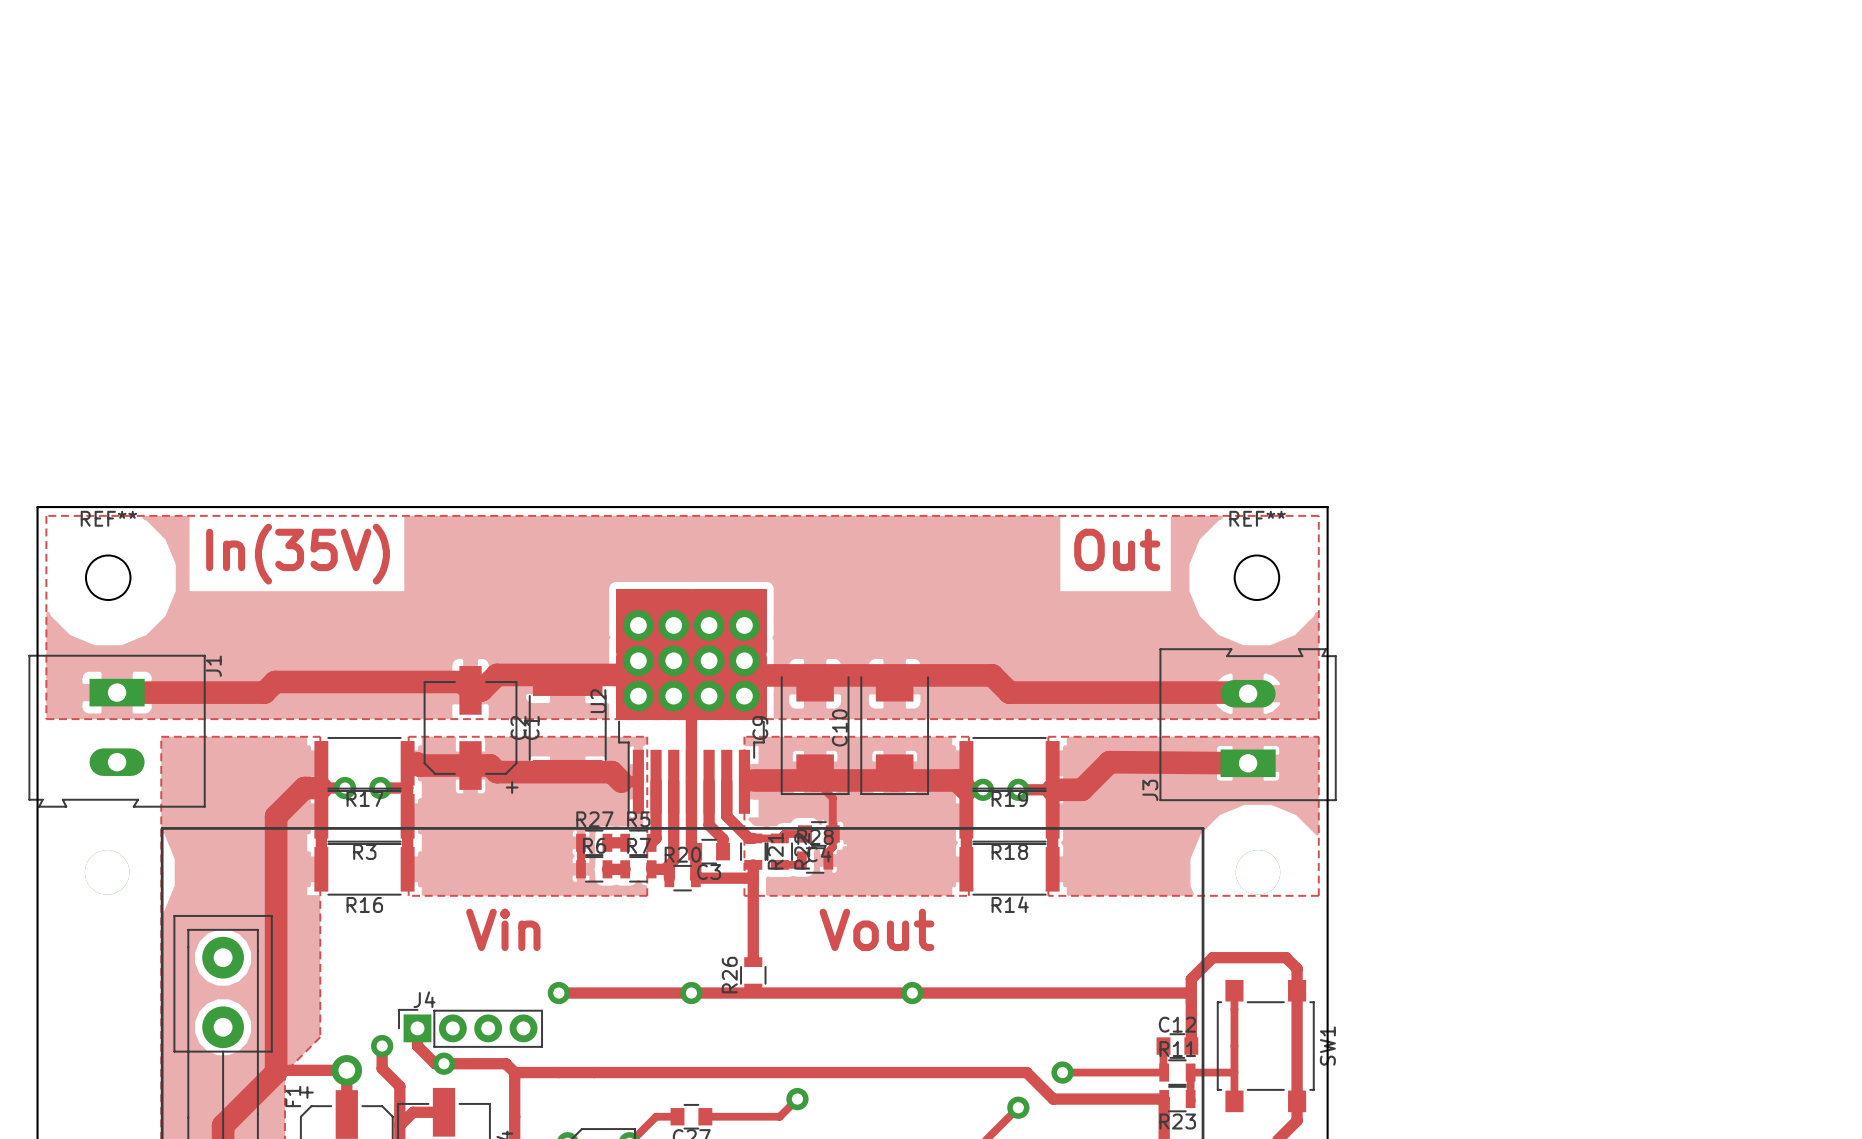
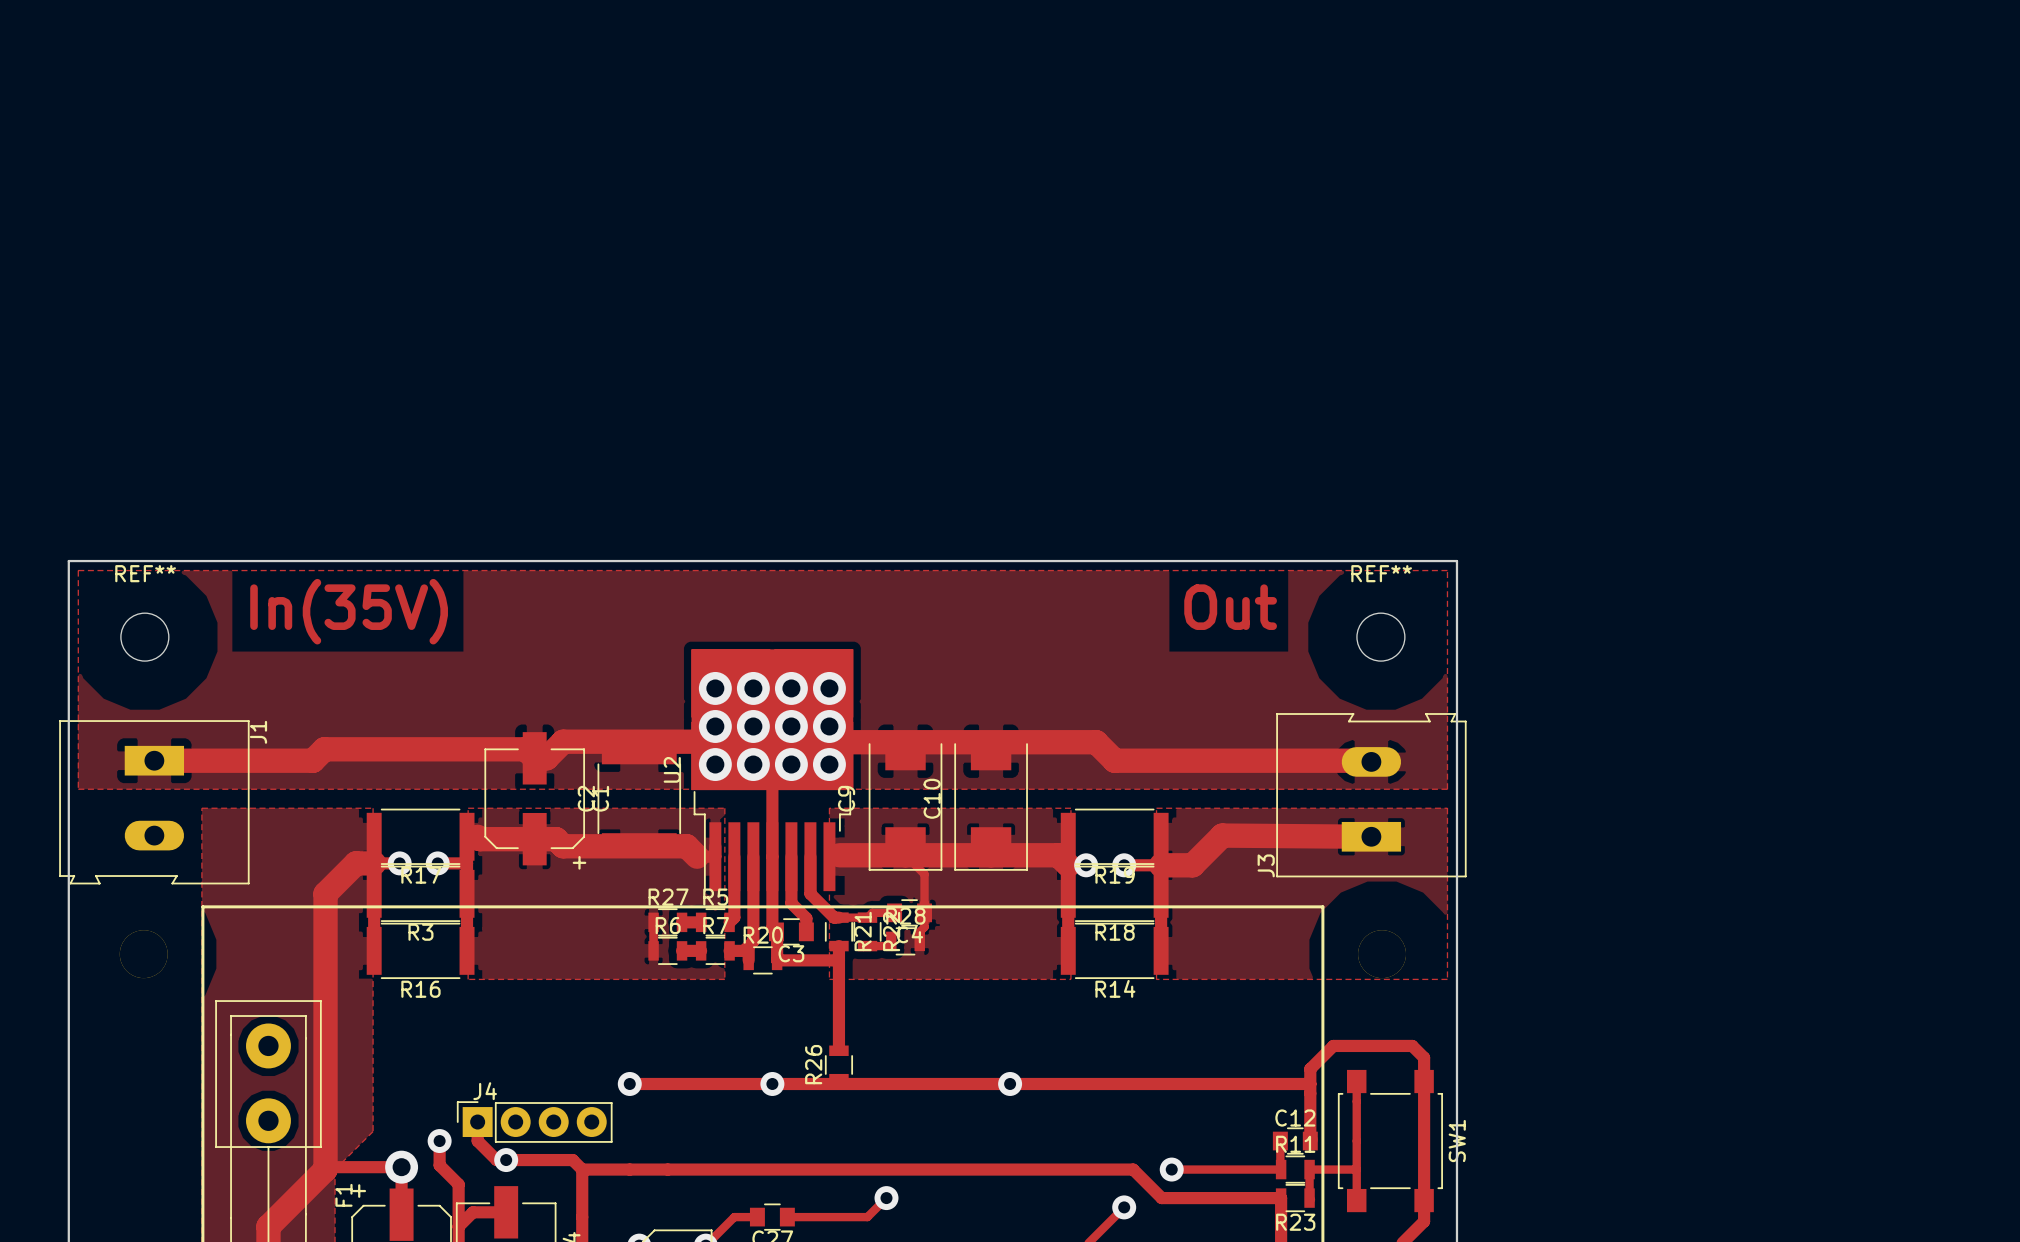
text: Vin (503, 929) -> none
text: Vout (876, 929) -> none

